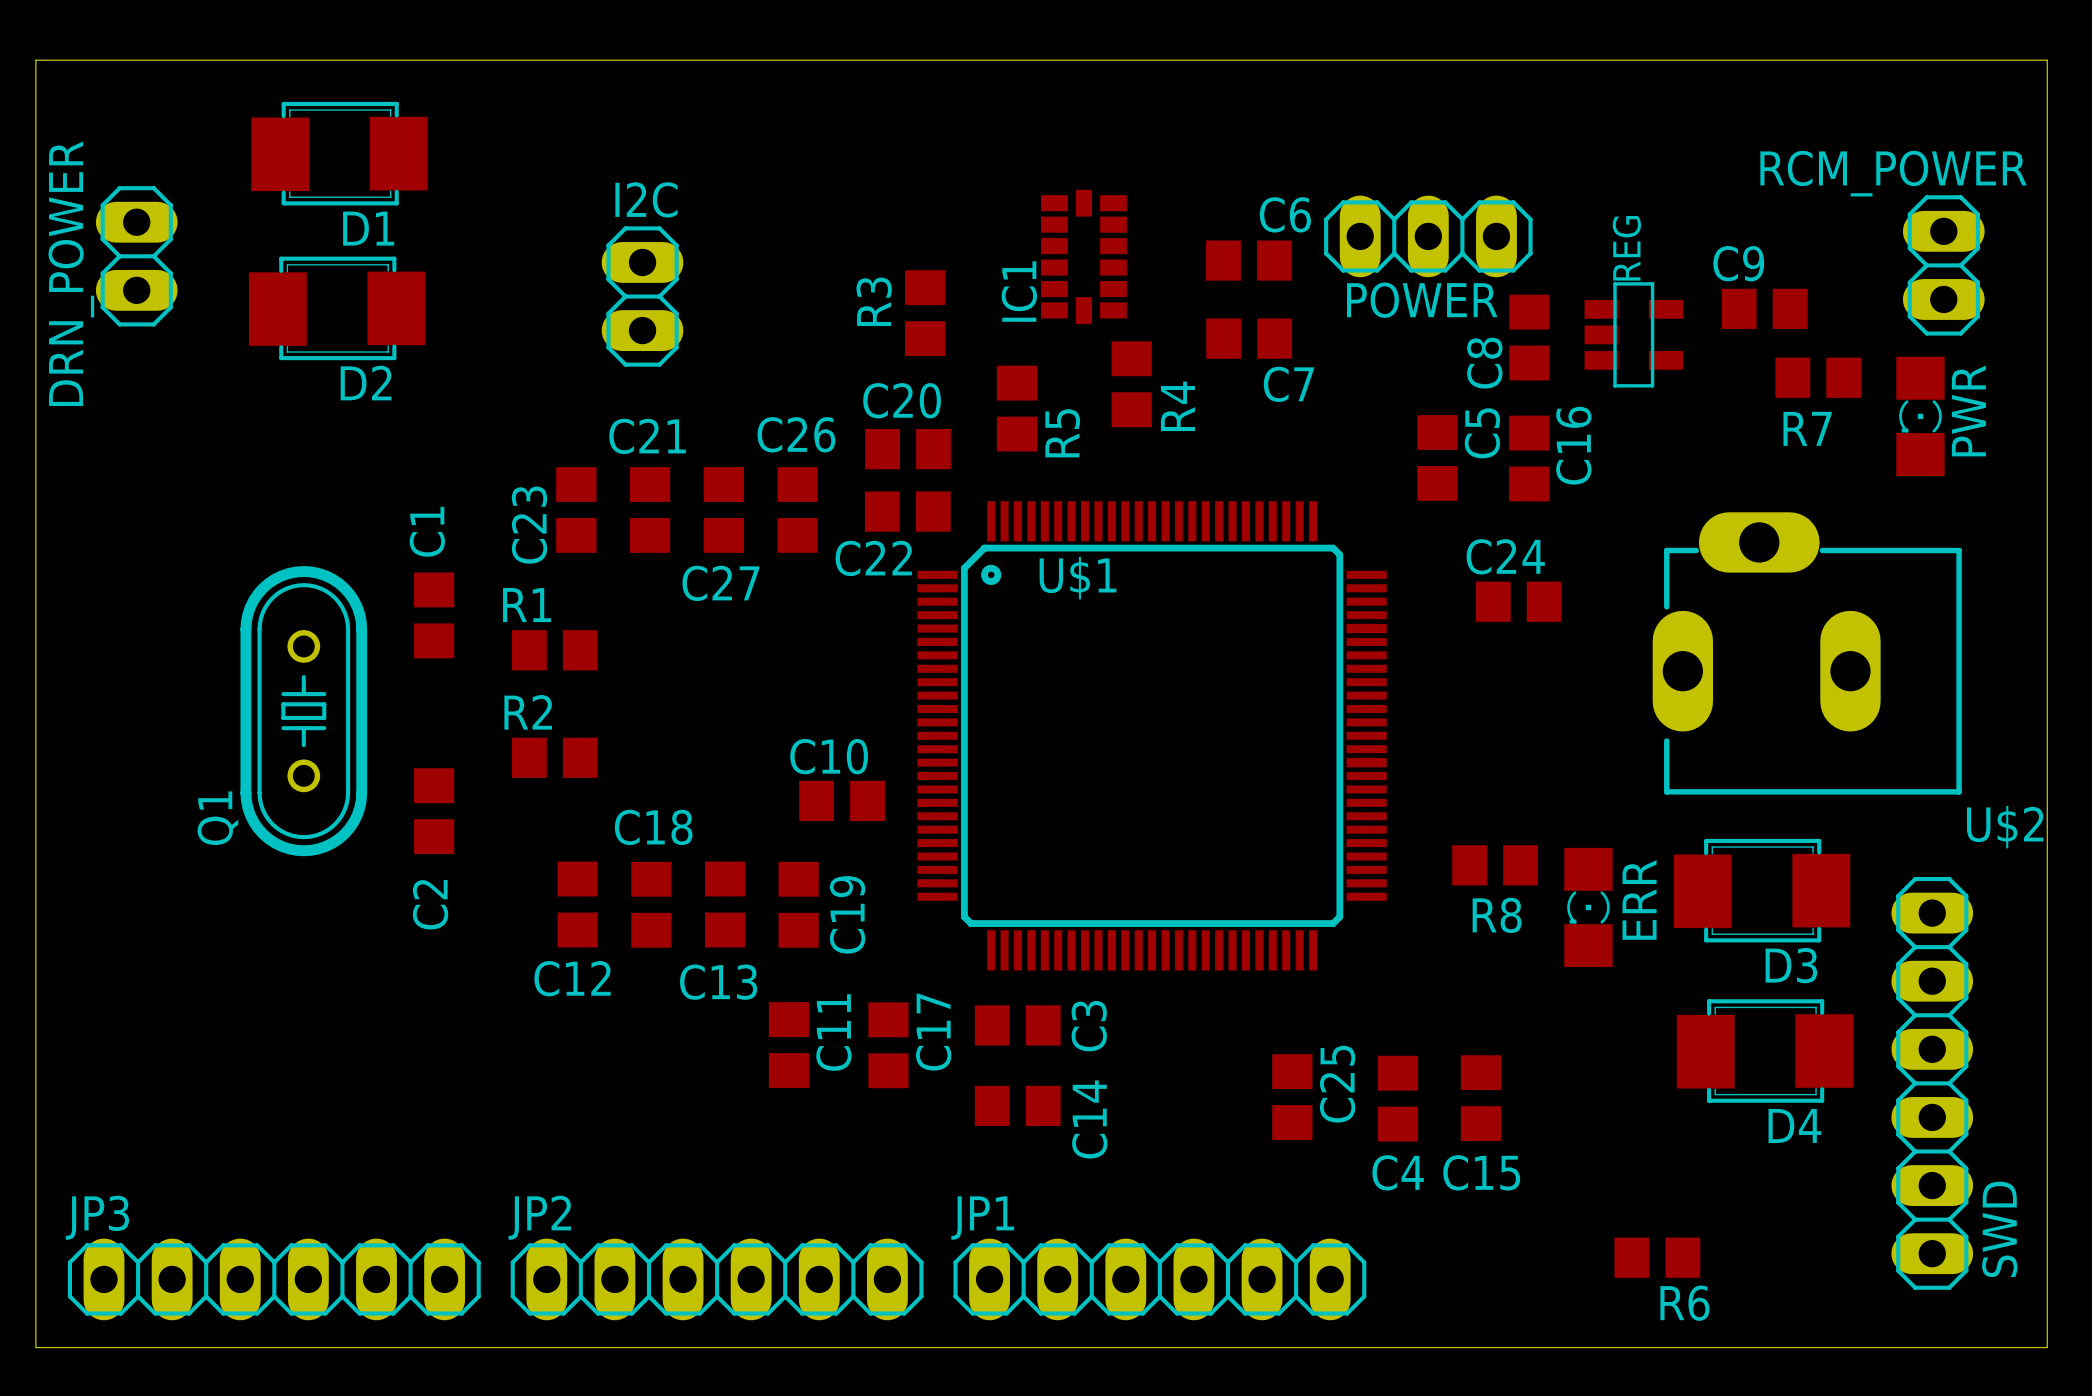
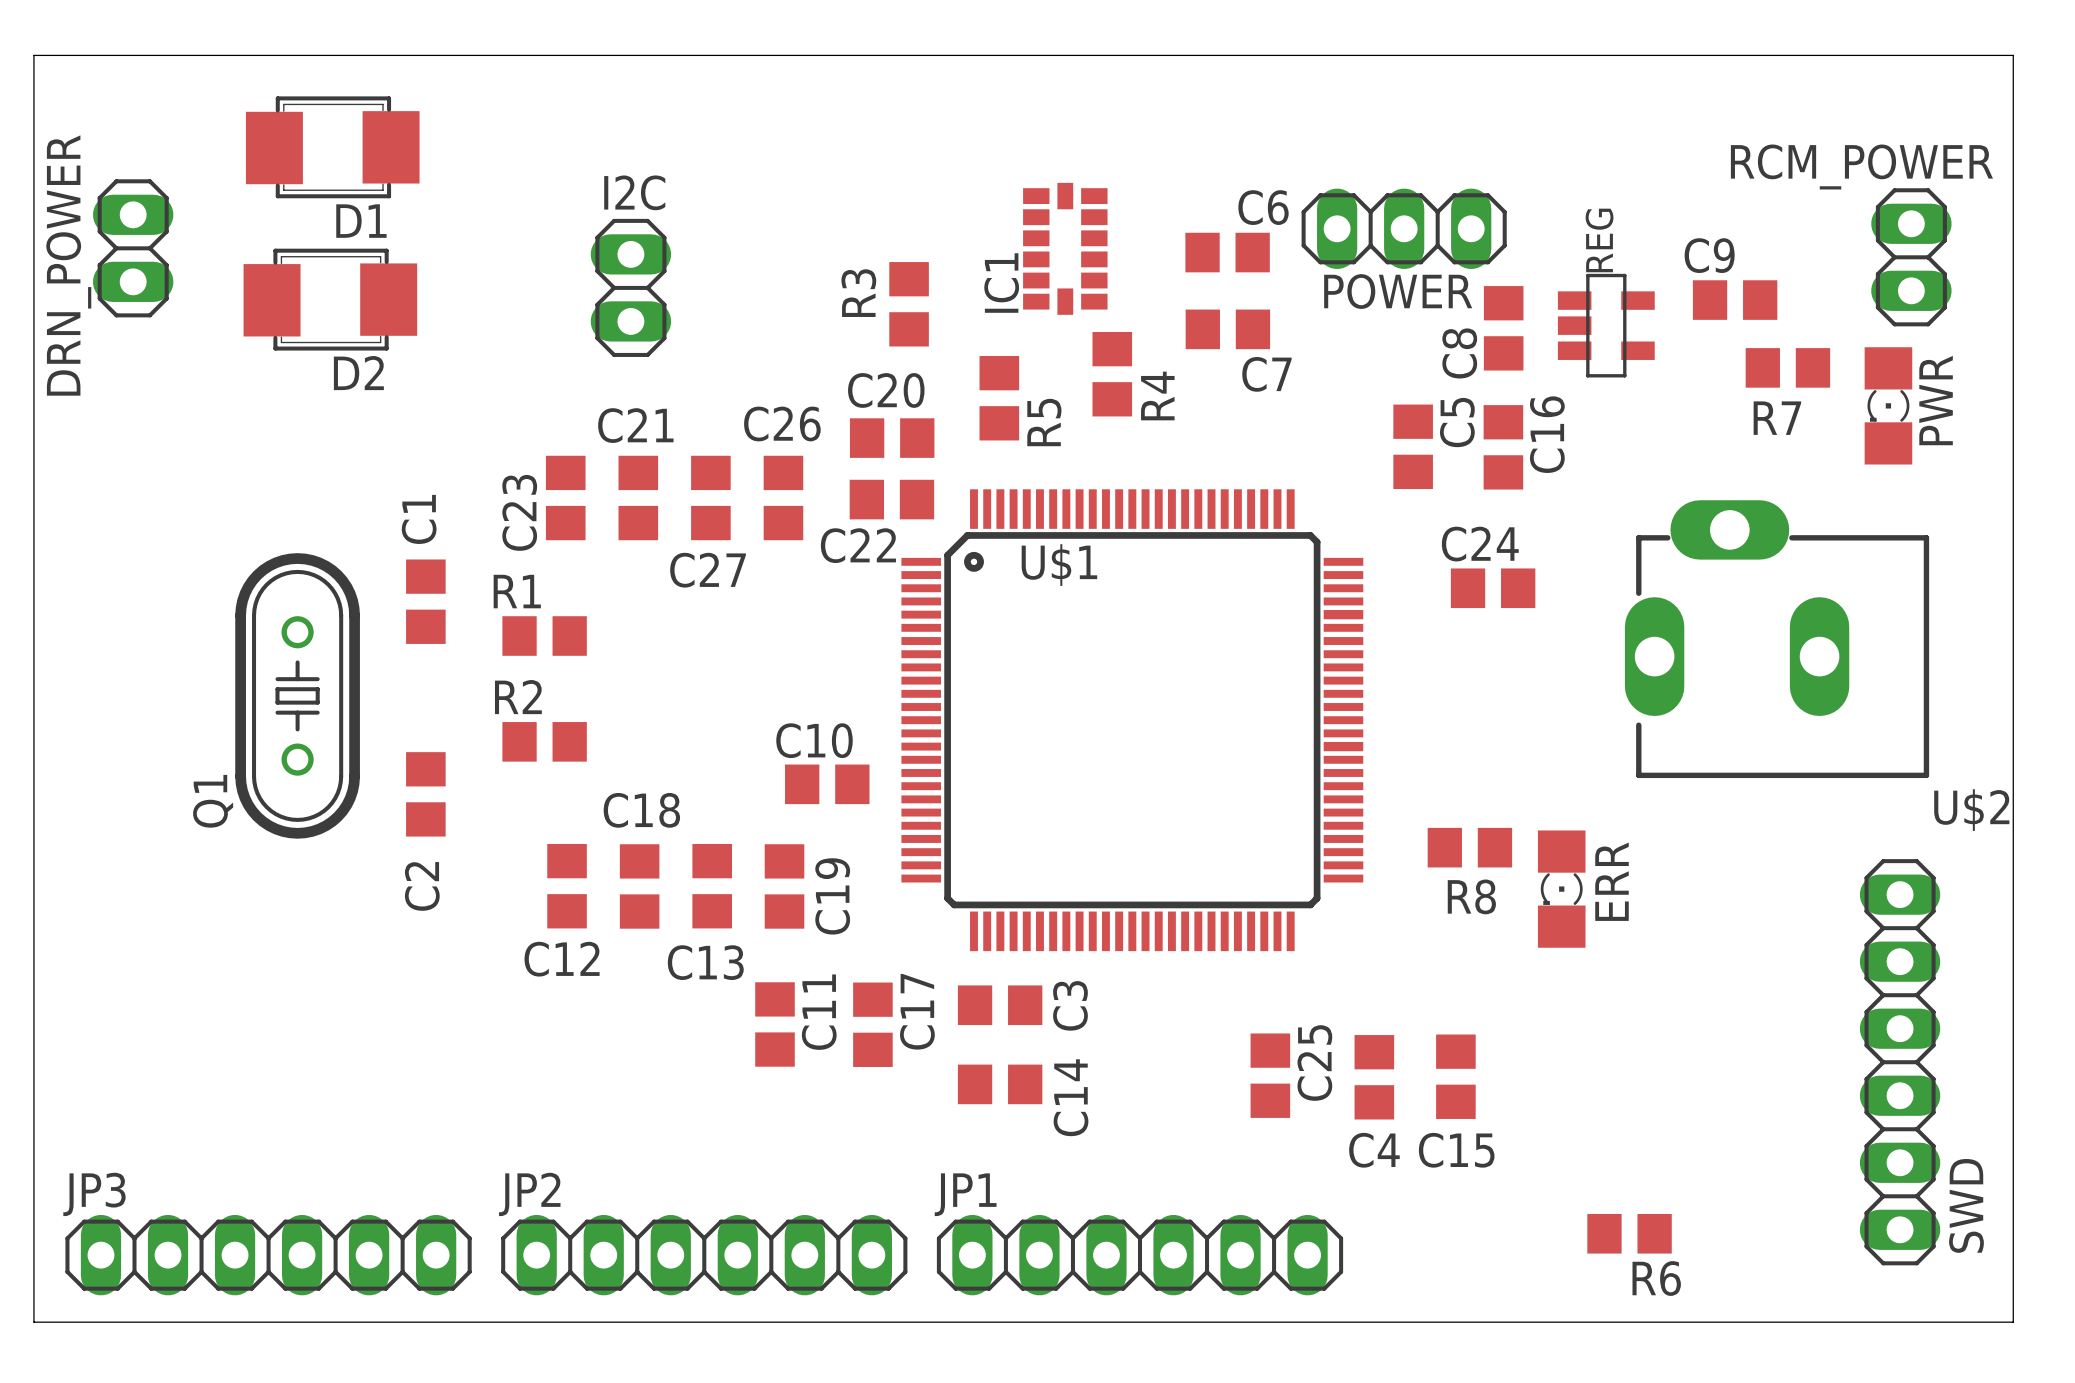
D3: (1762, 890) -> none
D4: (1764, 1051) -> none

